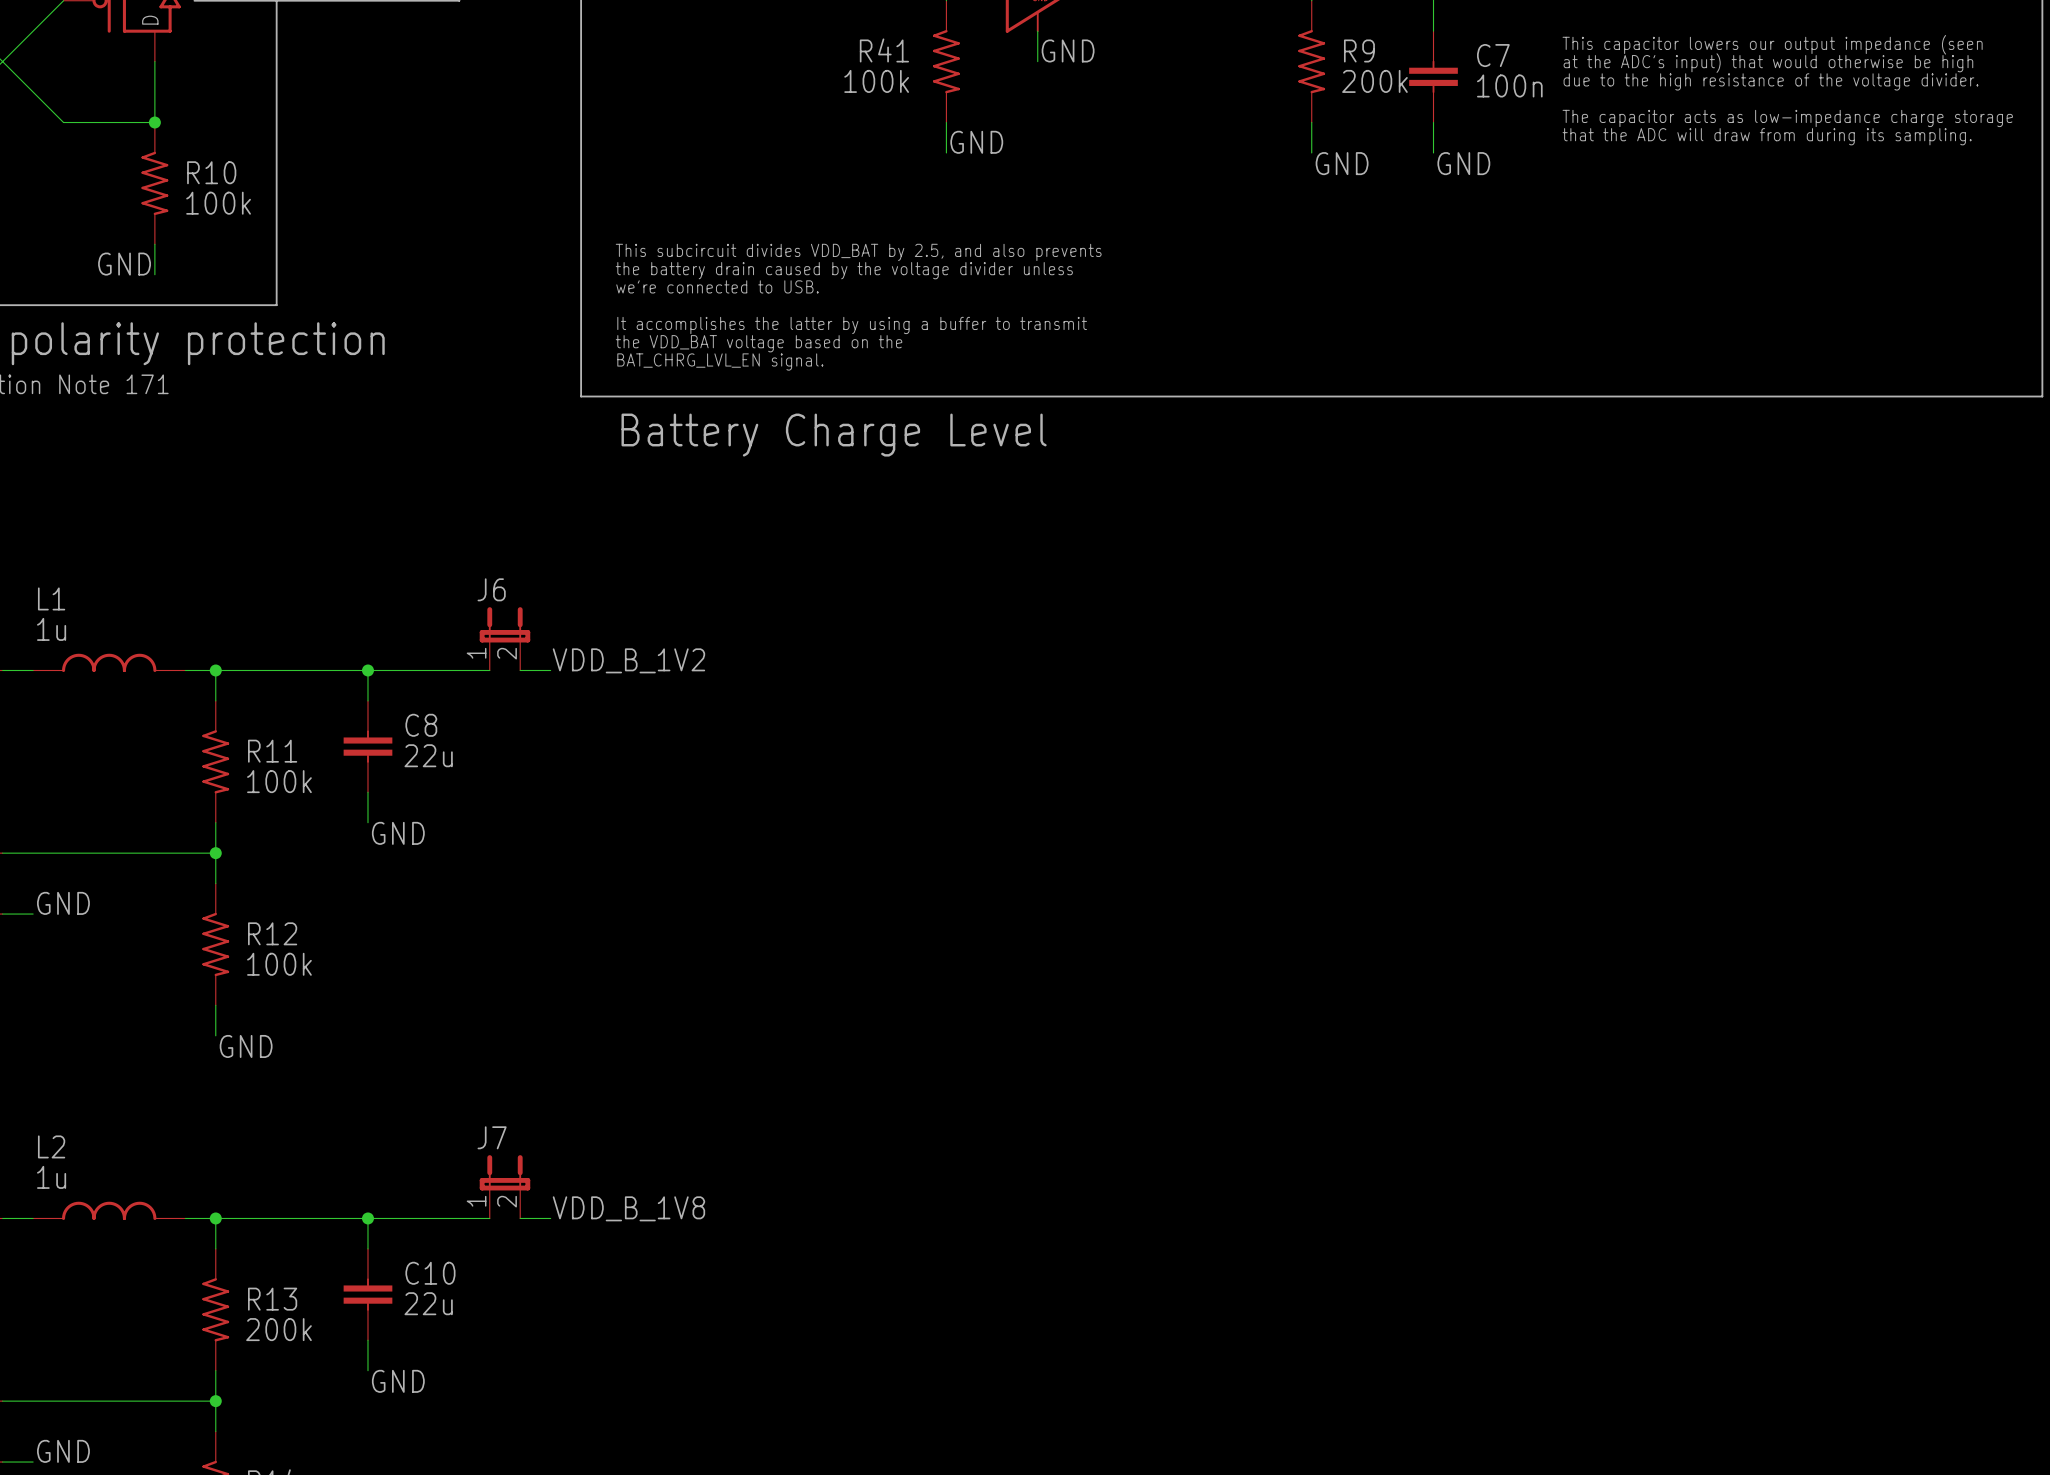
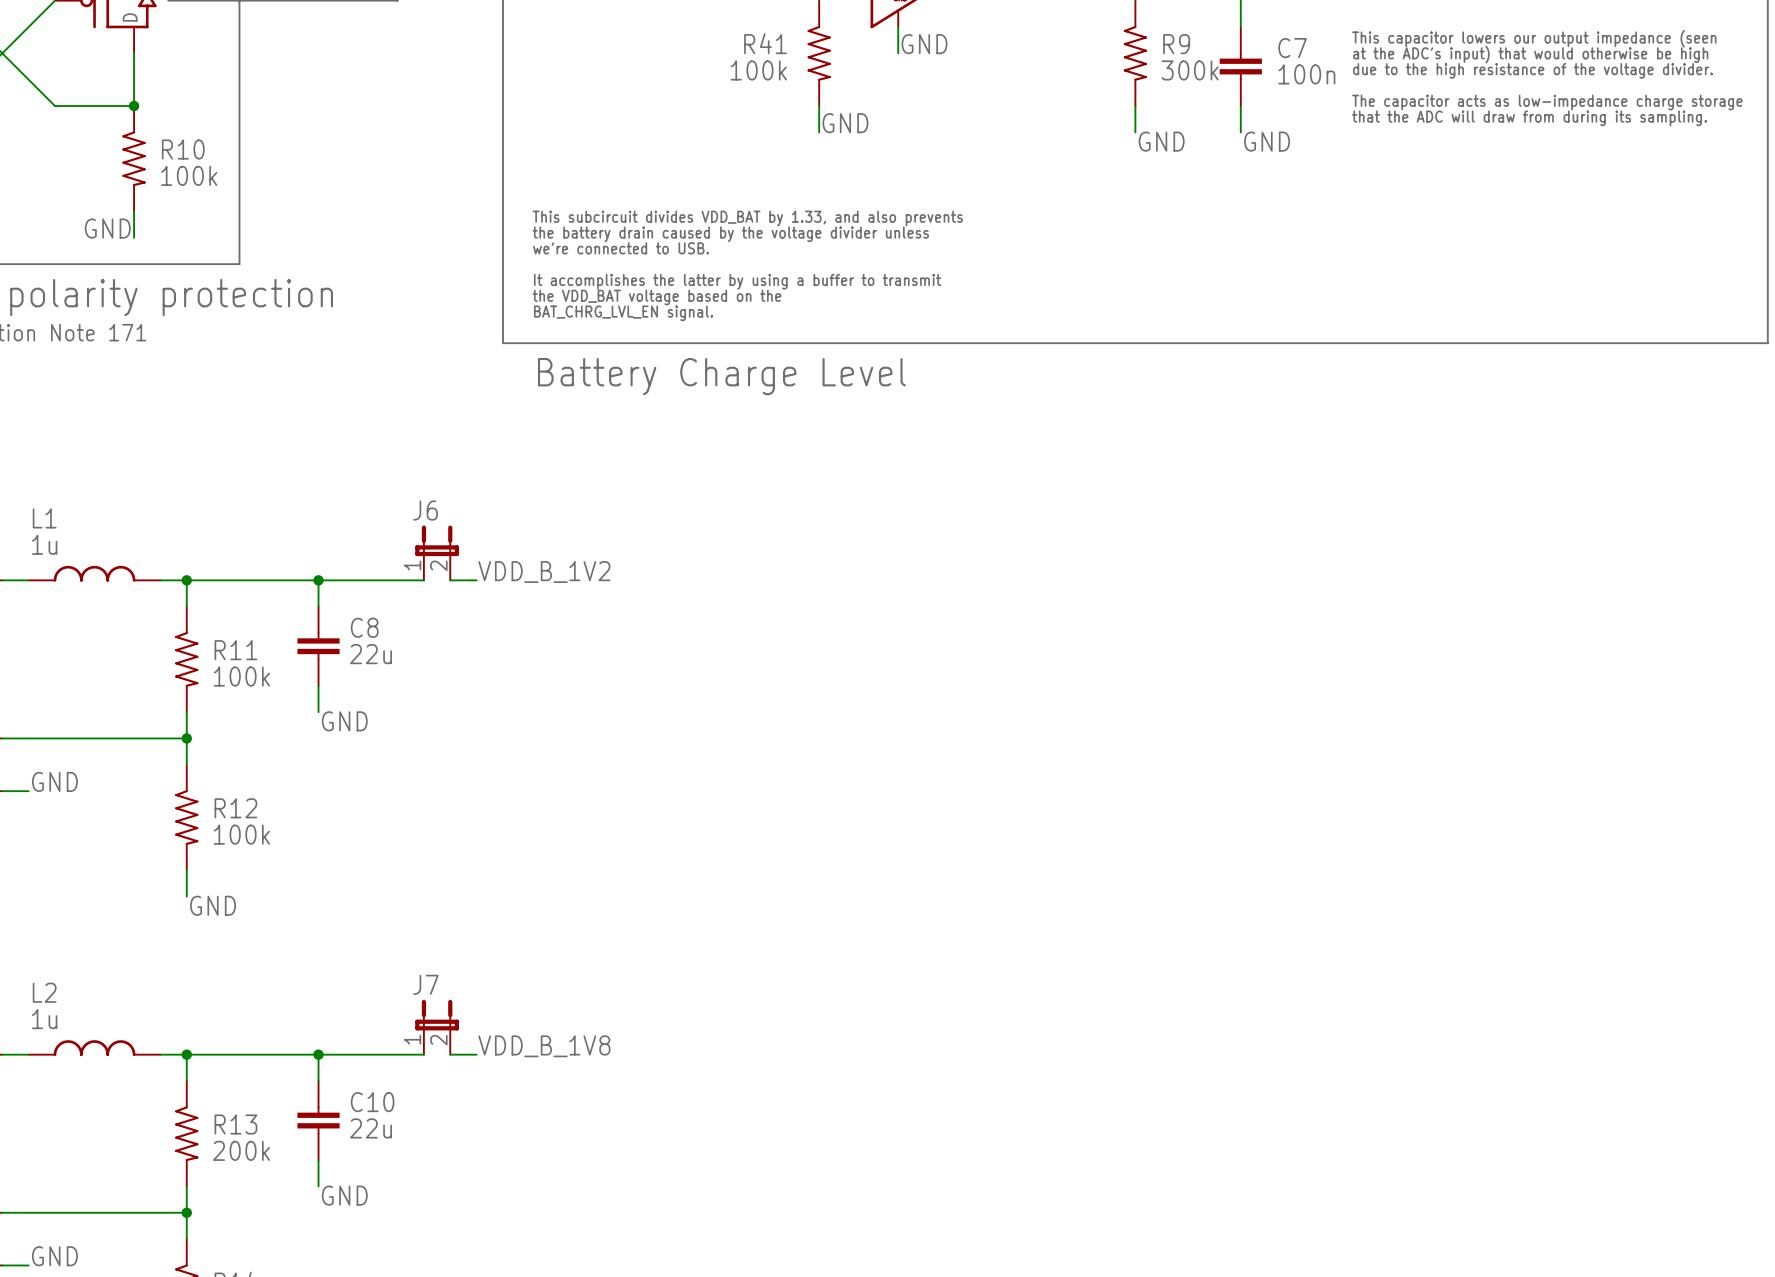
R9 value: 200k (1374, 81) -> 300k (1190, 70)
text: This subcircuit divides VDD_BAT by 2.5, and also prevents (858, 252) -> This subcircuit divides VDD_BAT by 1.33, and also prevents (747, 218)

